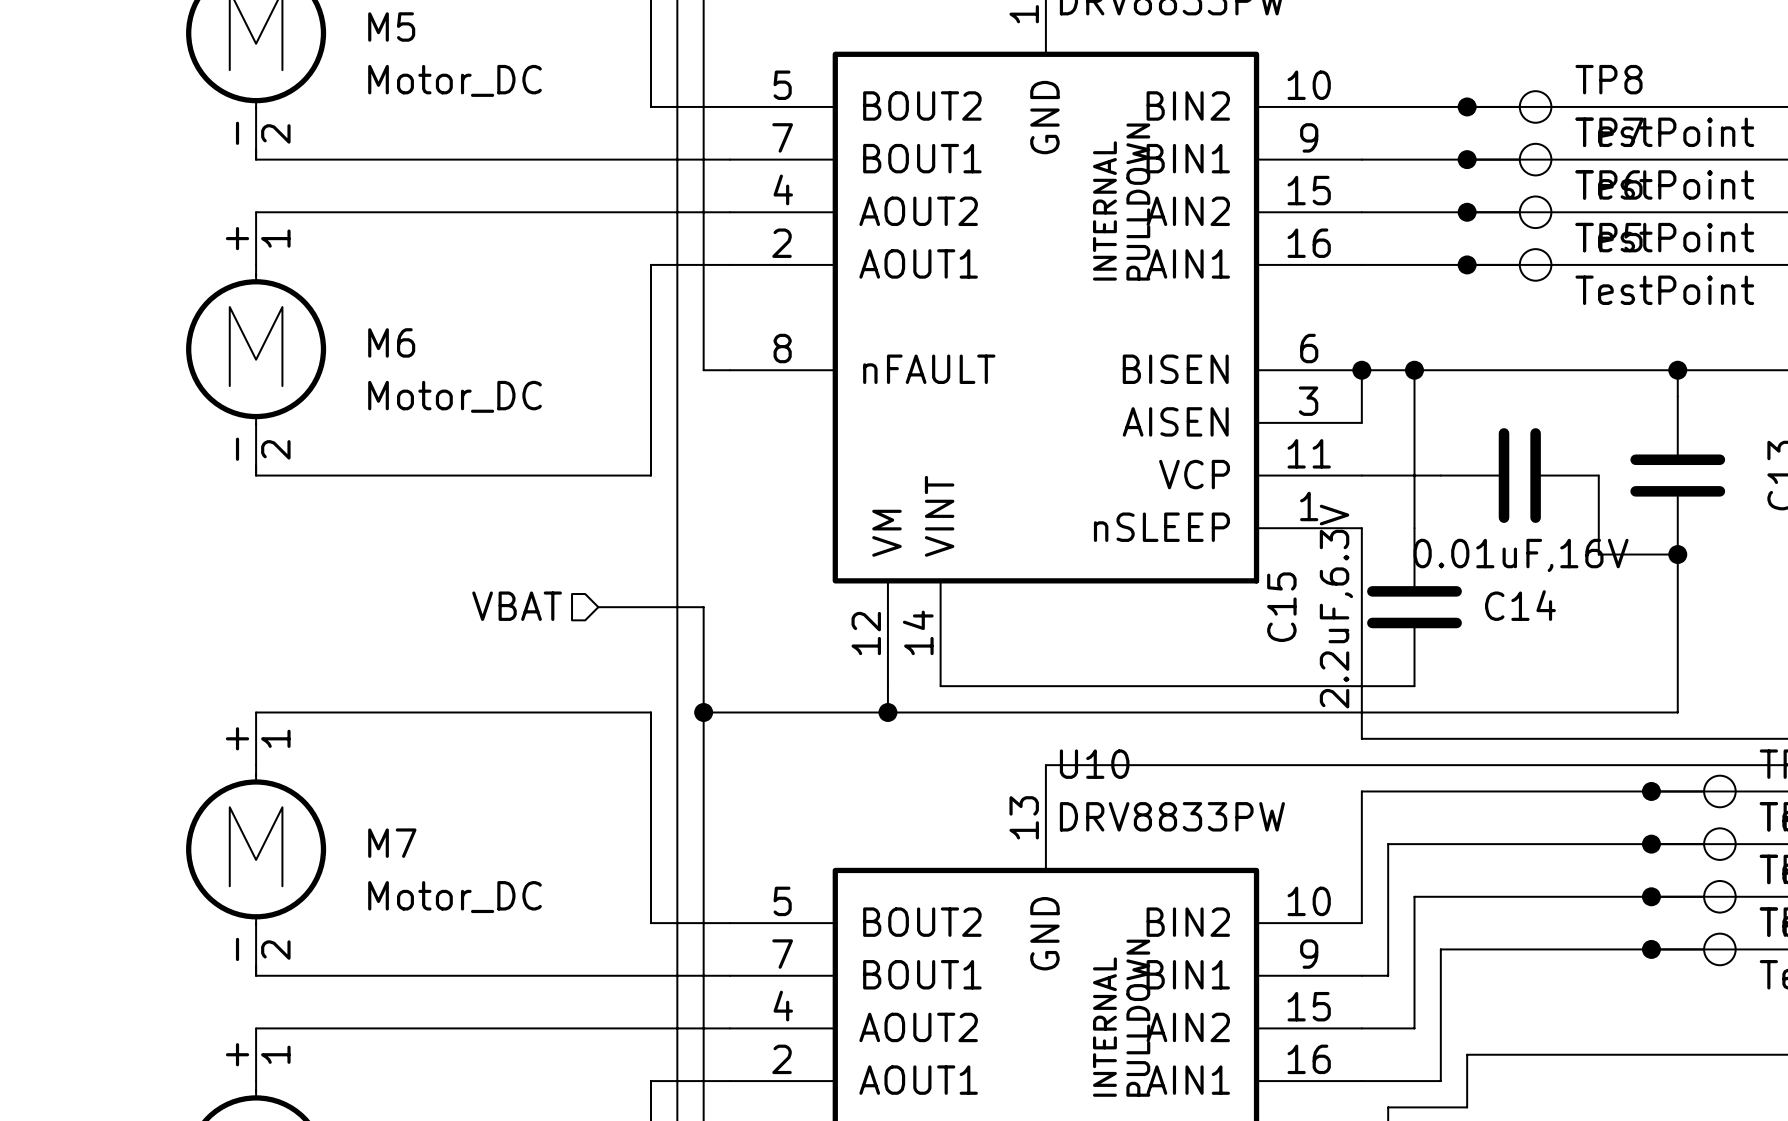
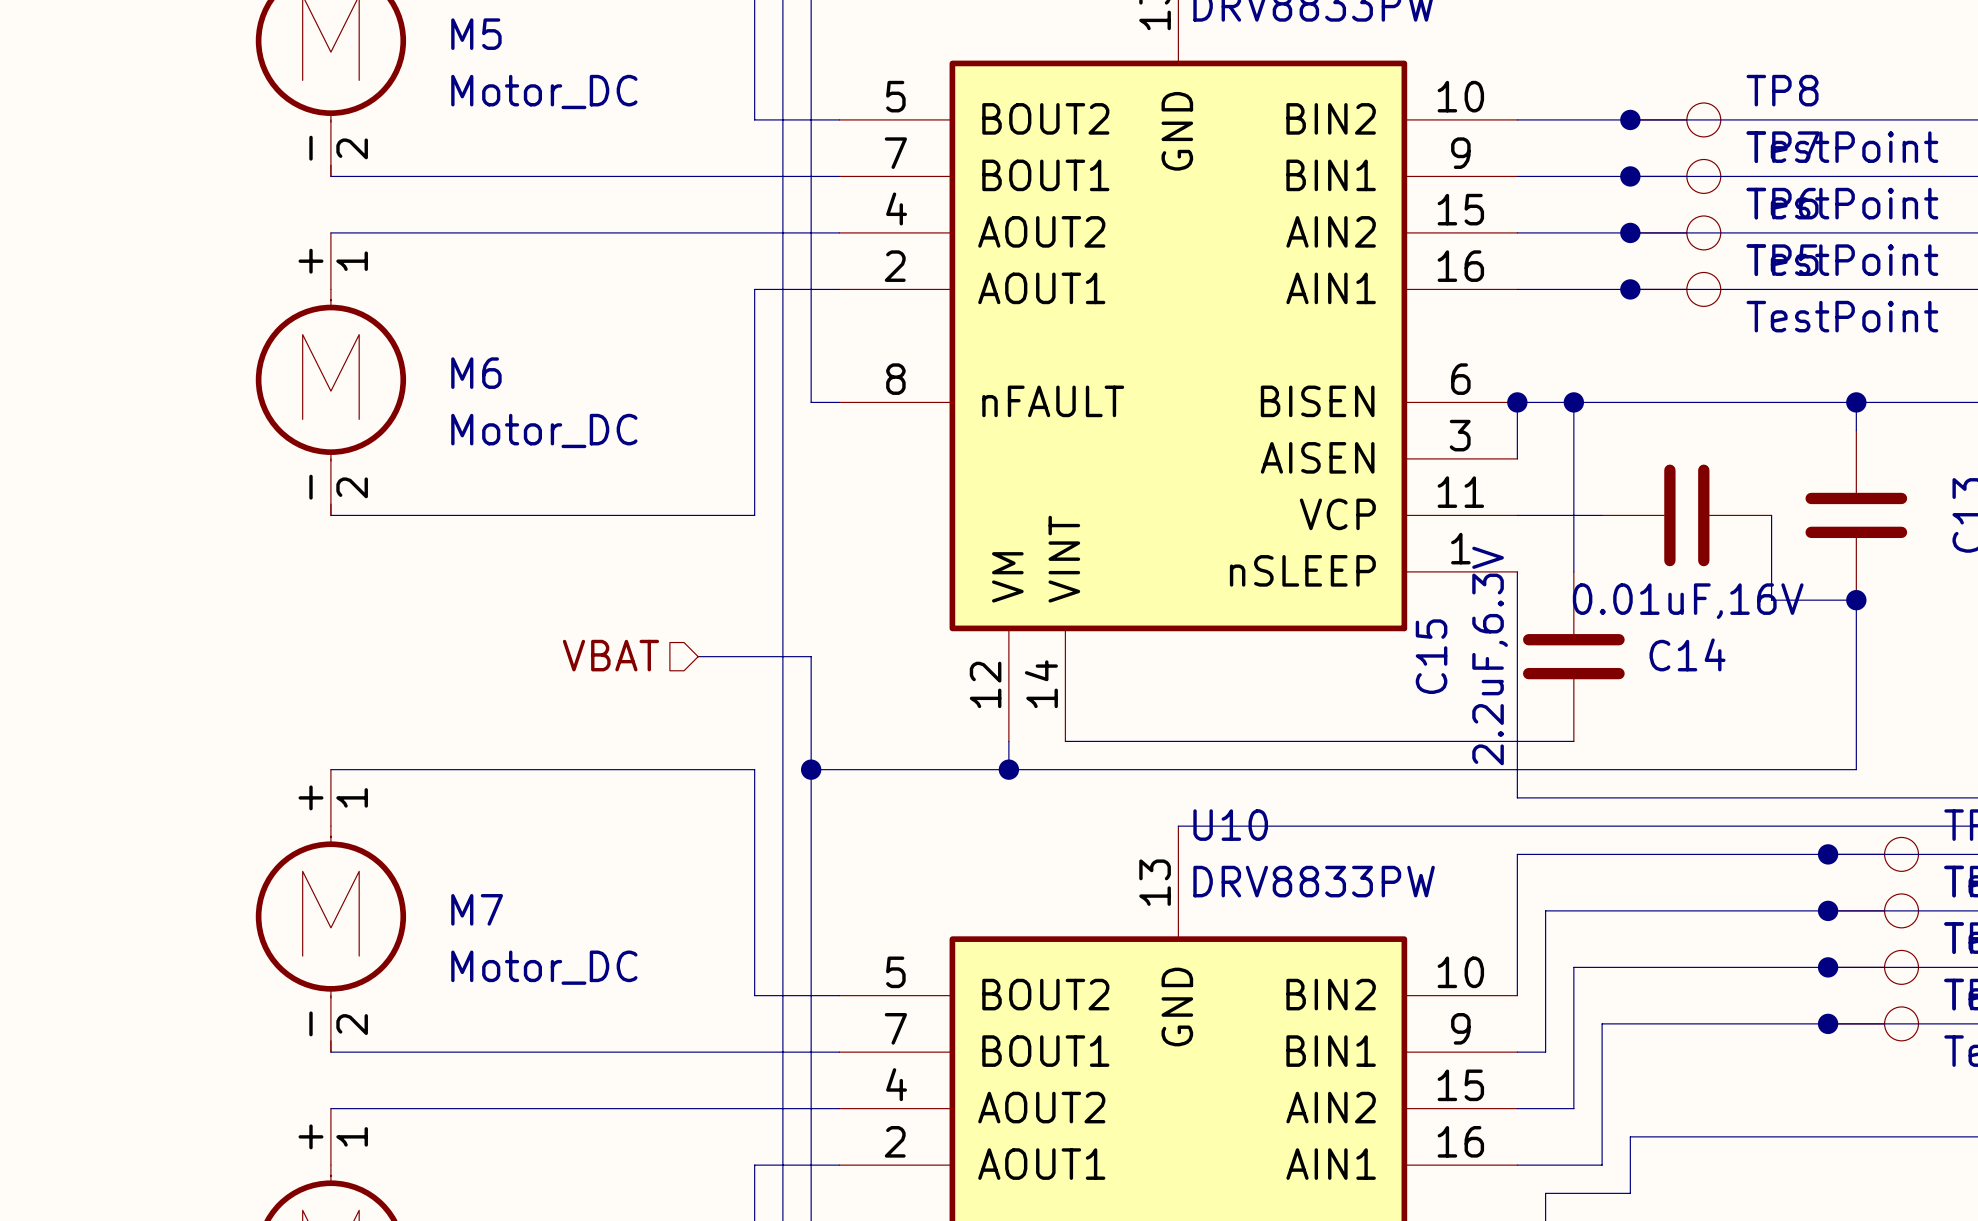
text: PULLDOWN (1138, 202) -> none
text: INTERNAL (1104, 210) -> none
text: PULLDOWN (1138, 1018) -> none
text: INTERNAL (1104, 1027) -> none

